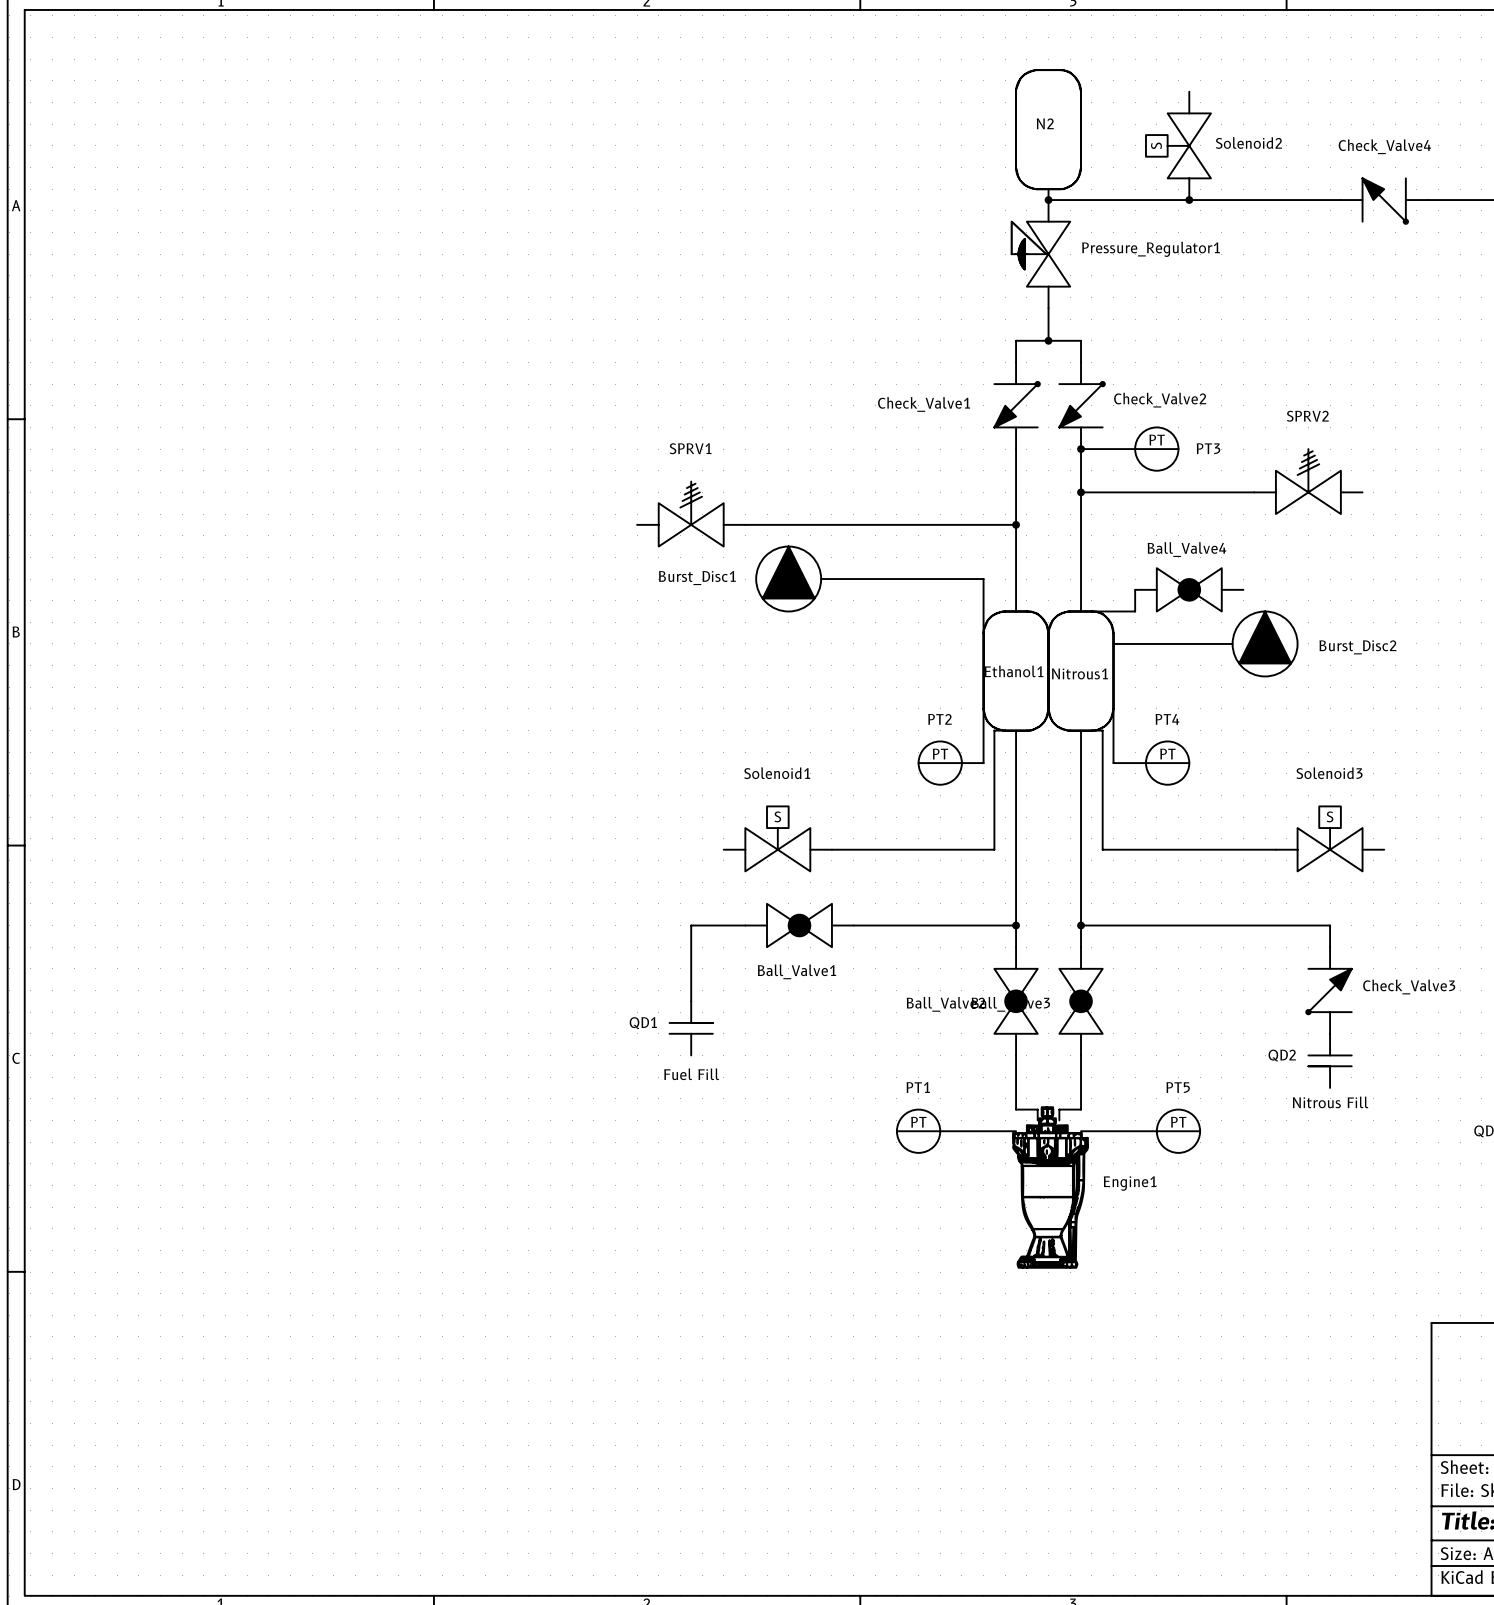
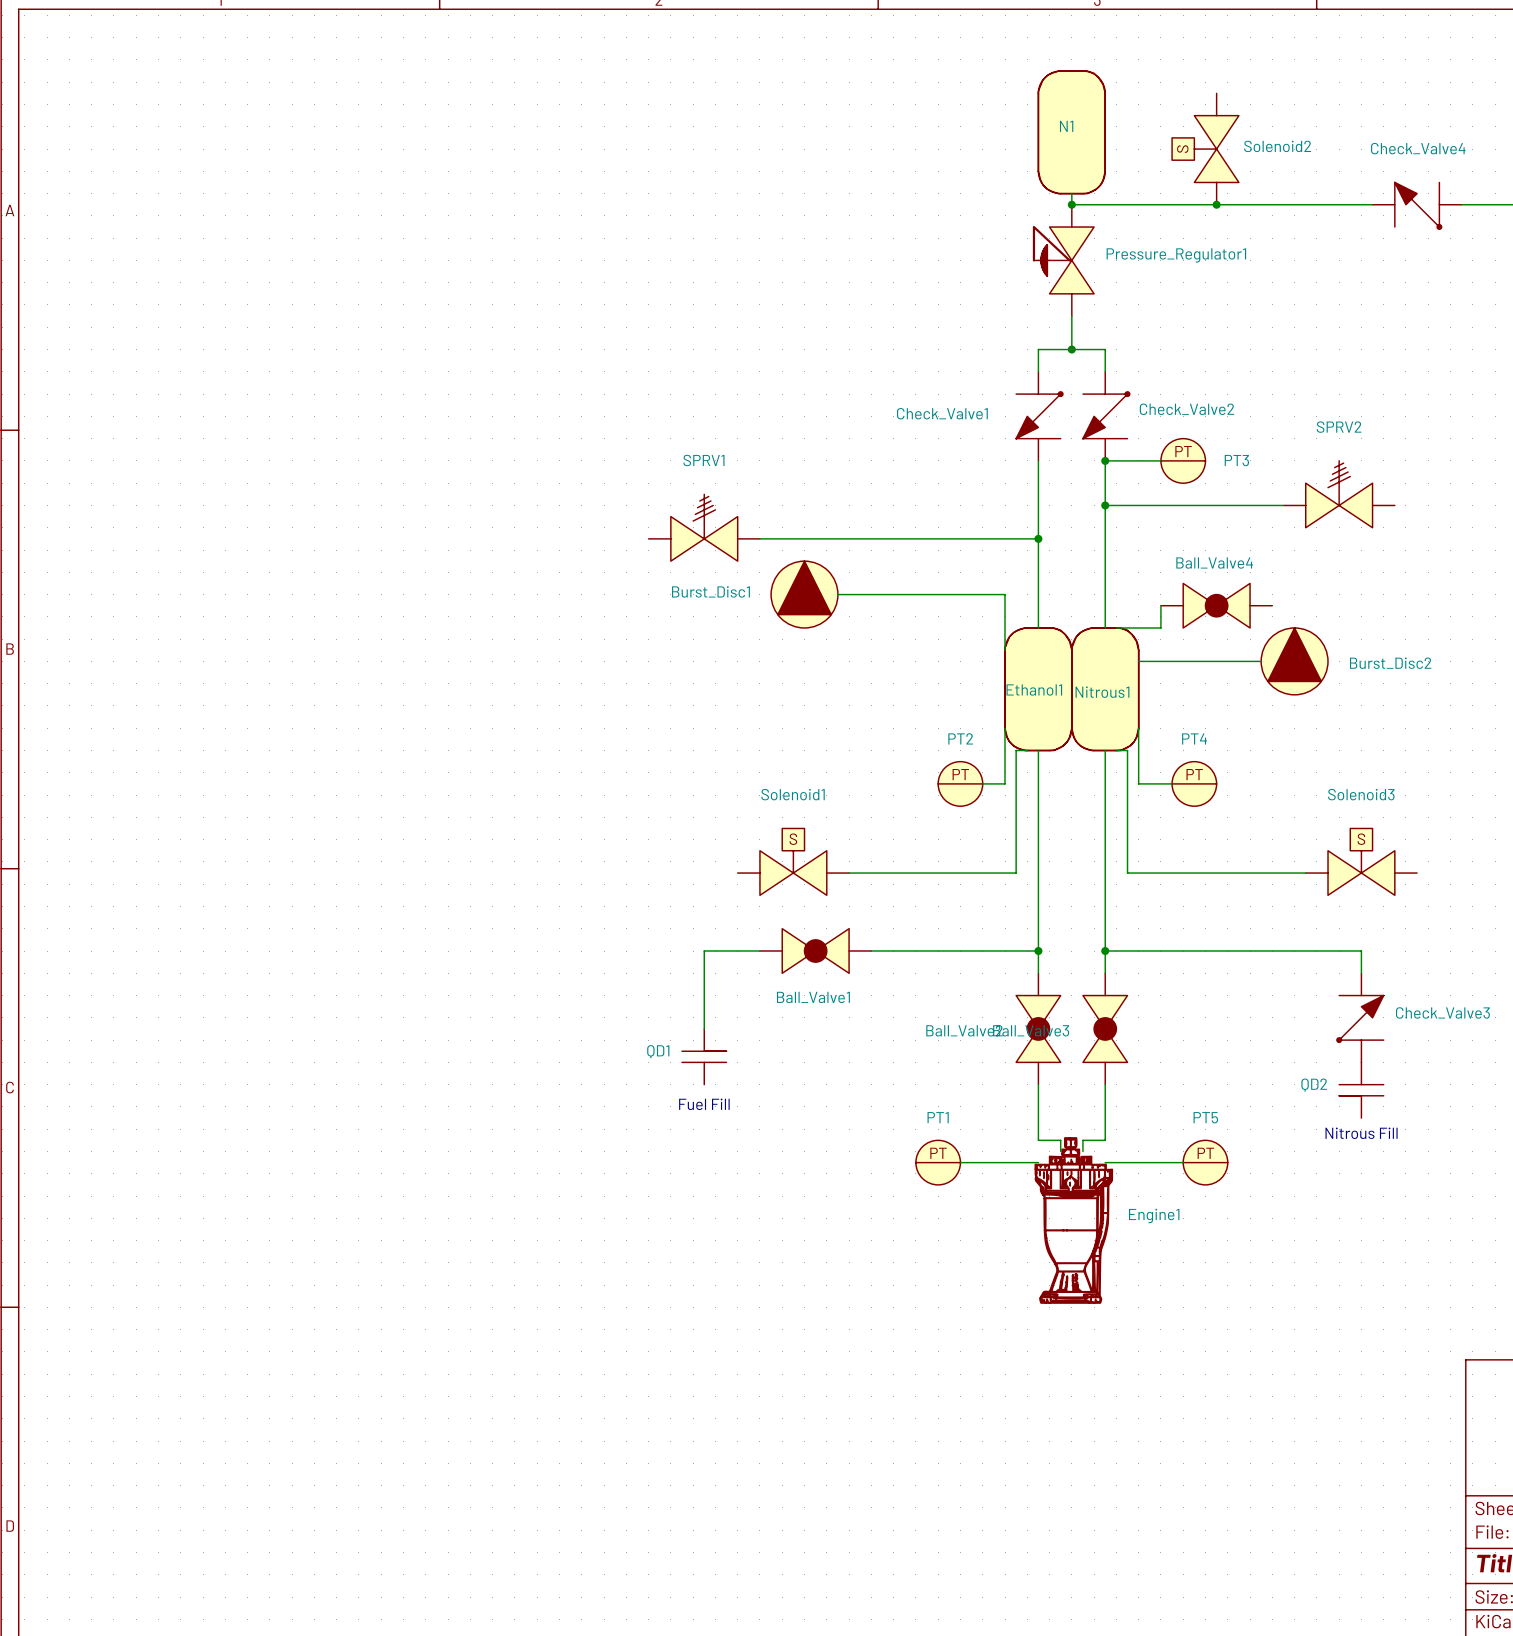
N2 name: N2 (1045, 123) -> N1 (1066, 126)

